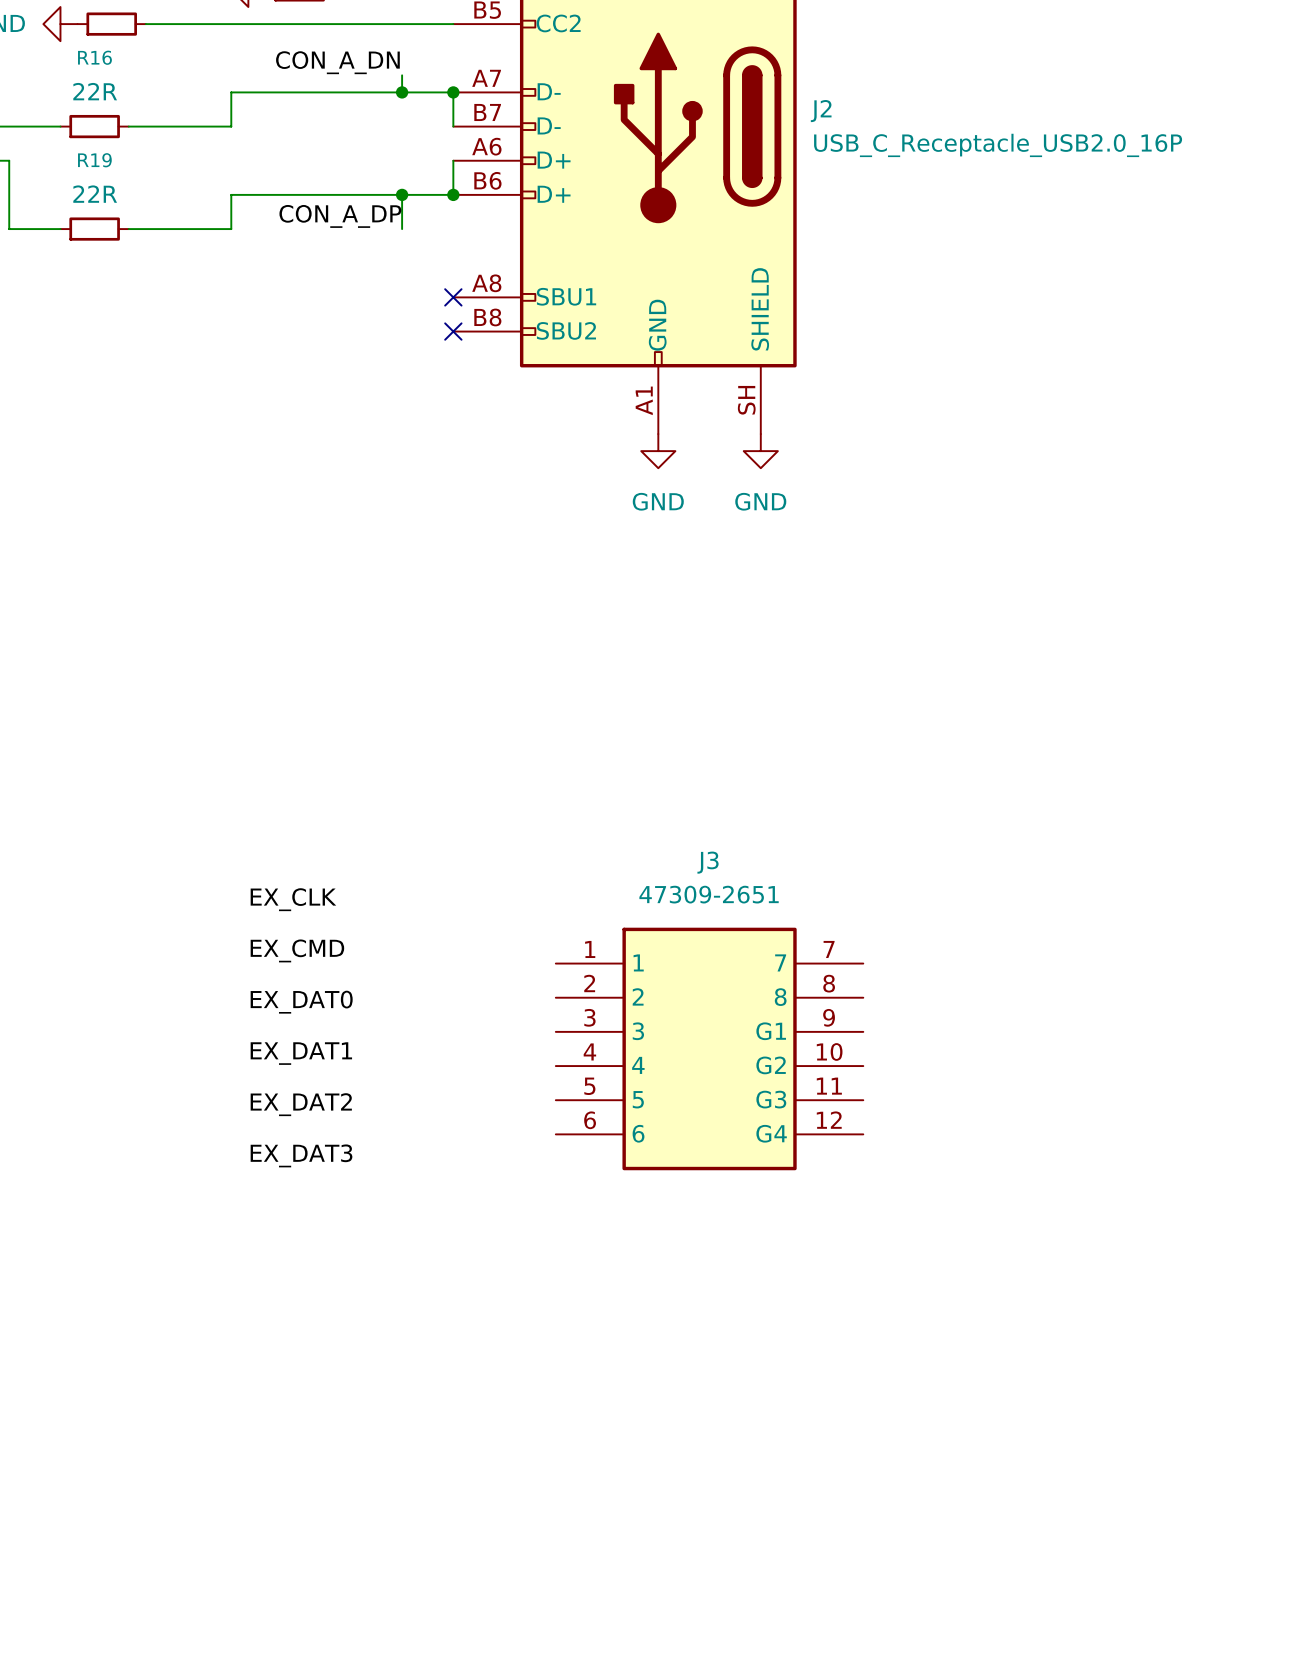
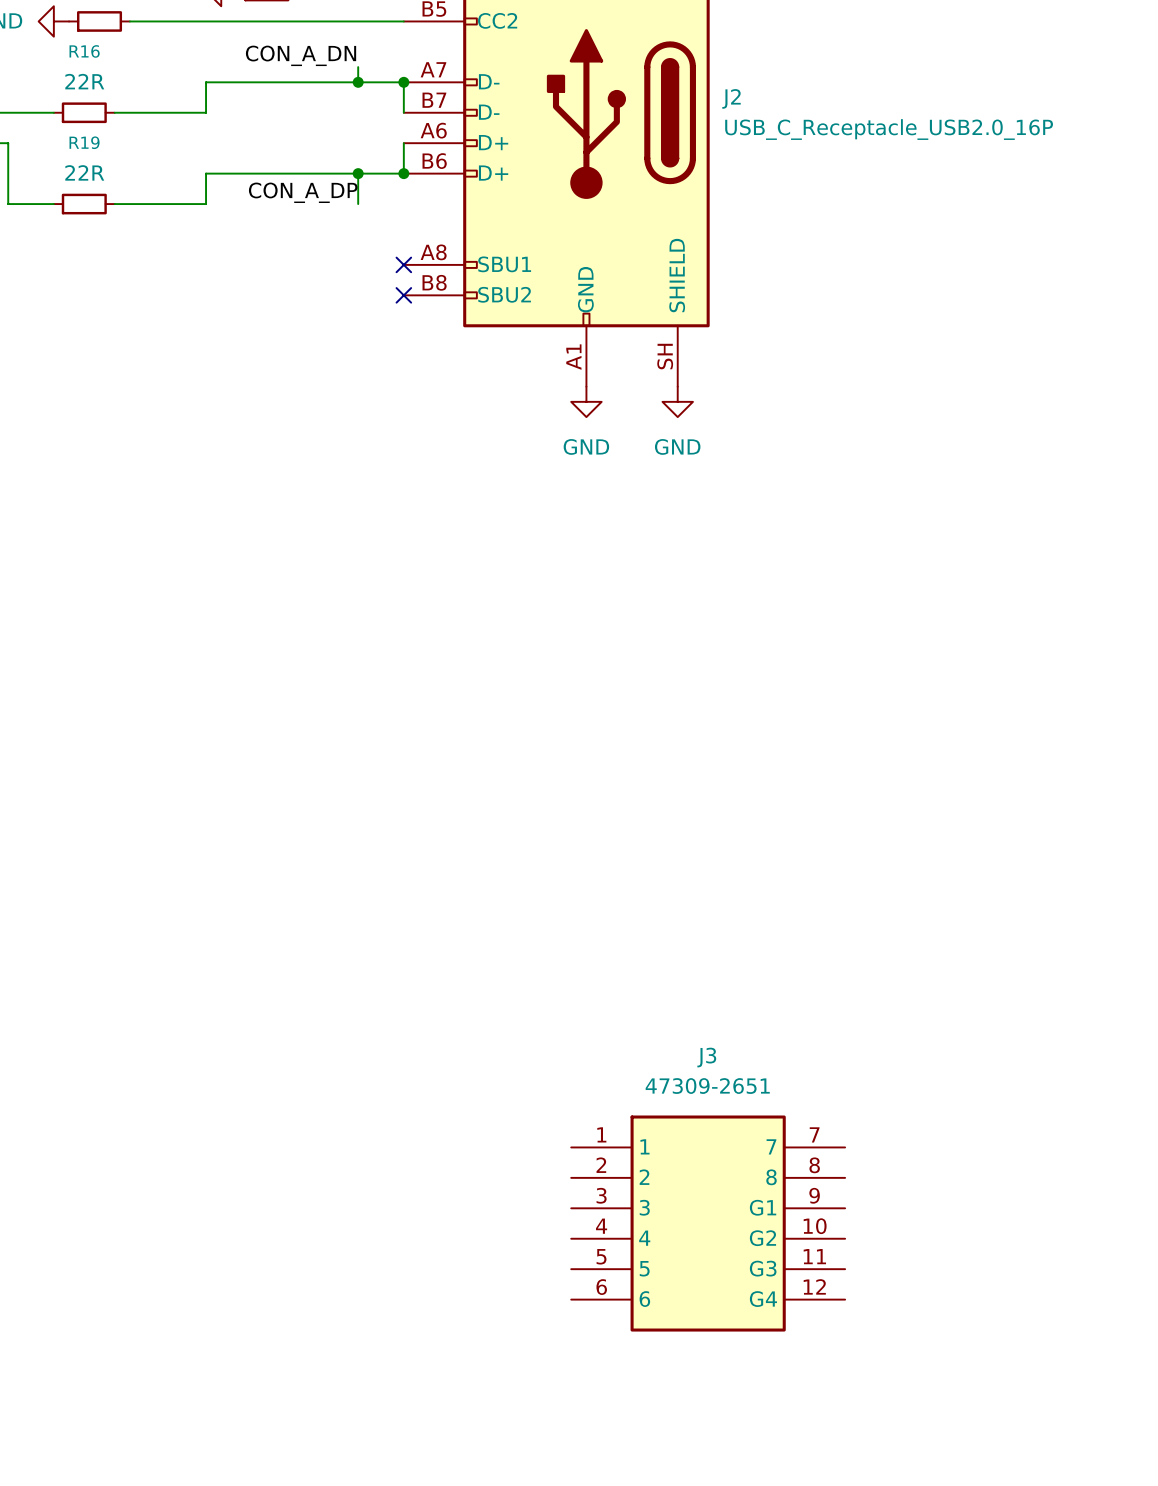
label: EX_CLK (293, 899) -> none
label: EX_CMD (297, 950) -> none
label: EX_DAT0 (301, 1002) -> none
J3 position: (709, 1048) -> (708, 1223)
label: EX_DAT1 (301, 1053) -> none
label: EX_DAT2 (301, 1104) -> none
label: EX_DAT3 (301, 1155) -> none

